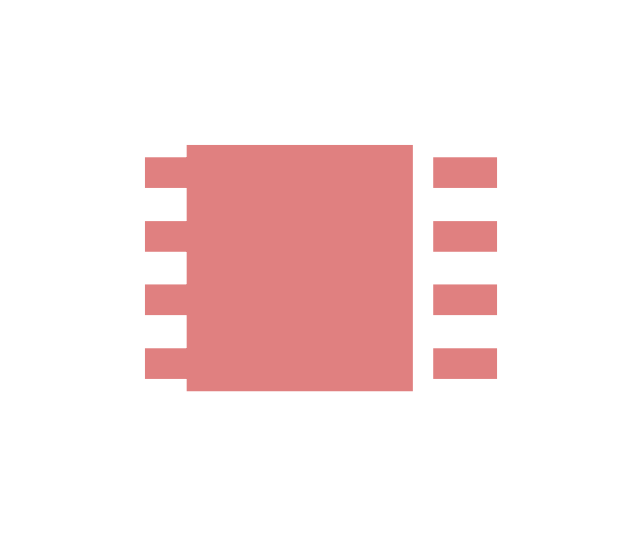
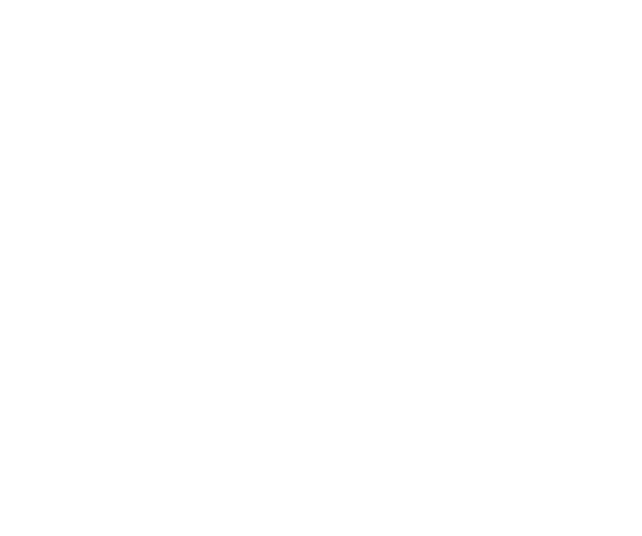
part: (321, 268) -> none

